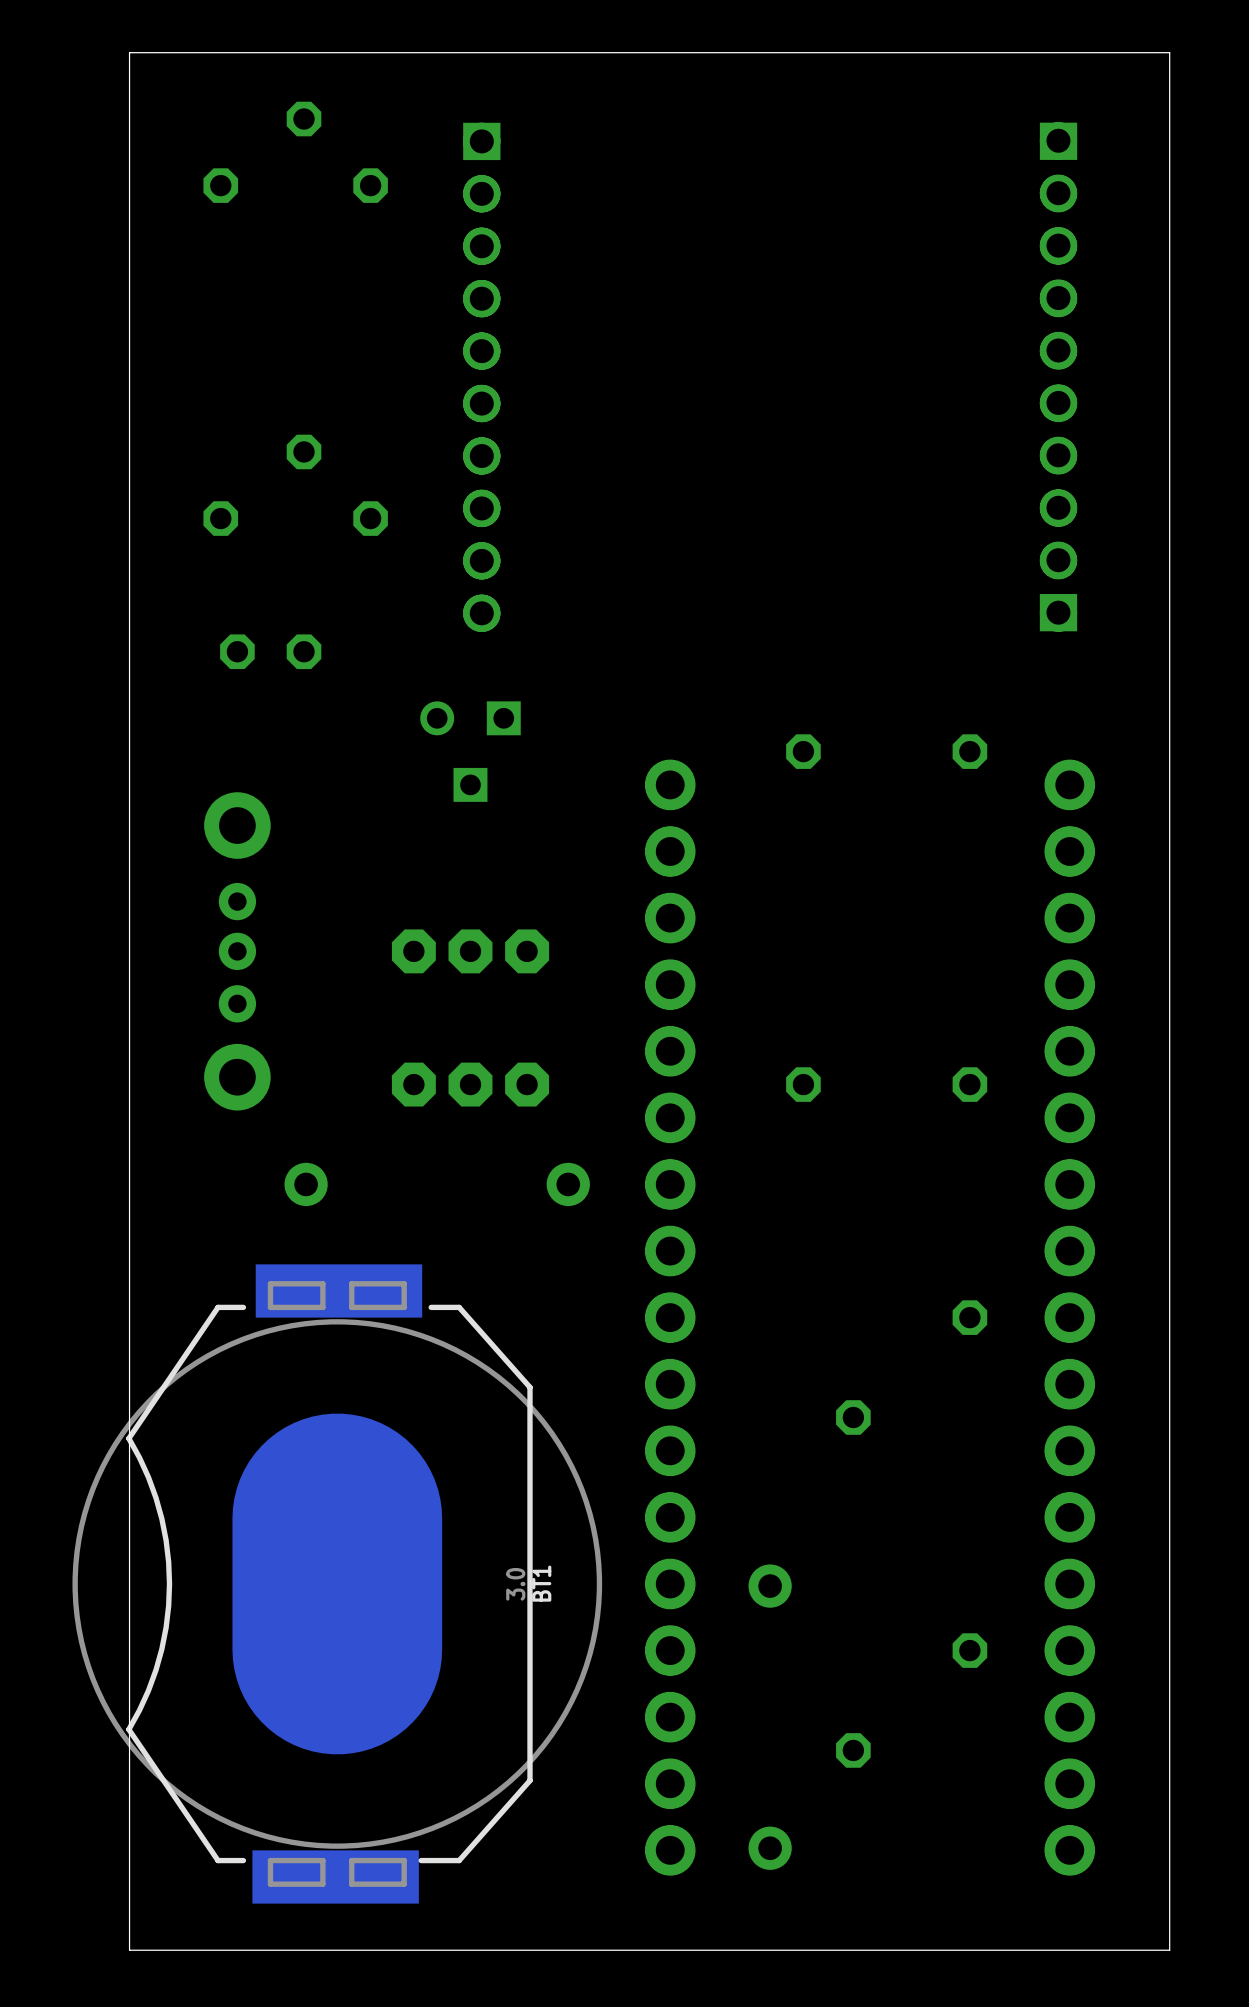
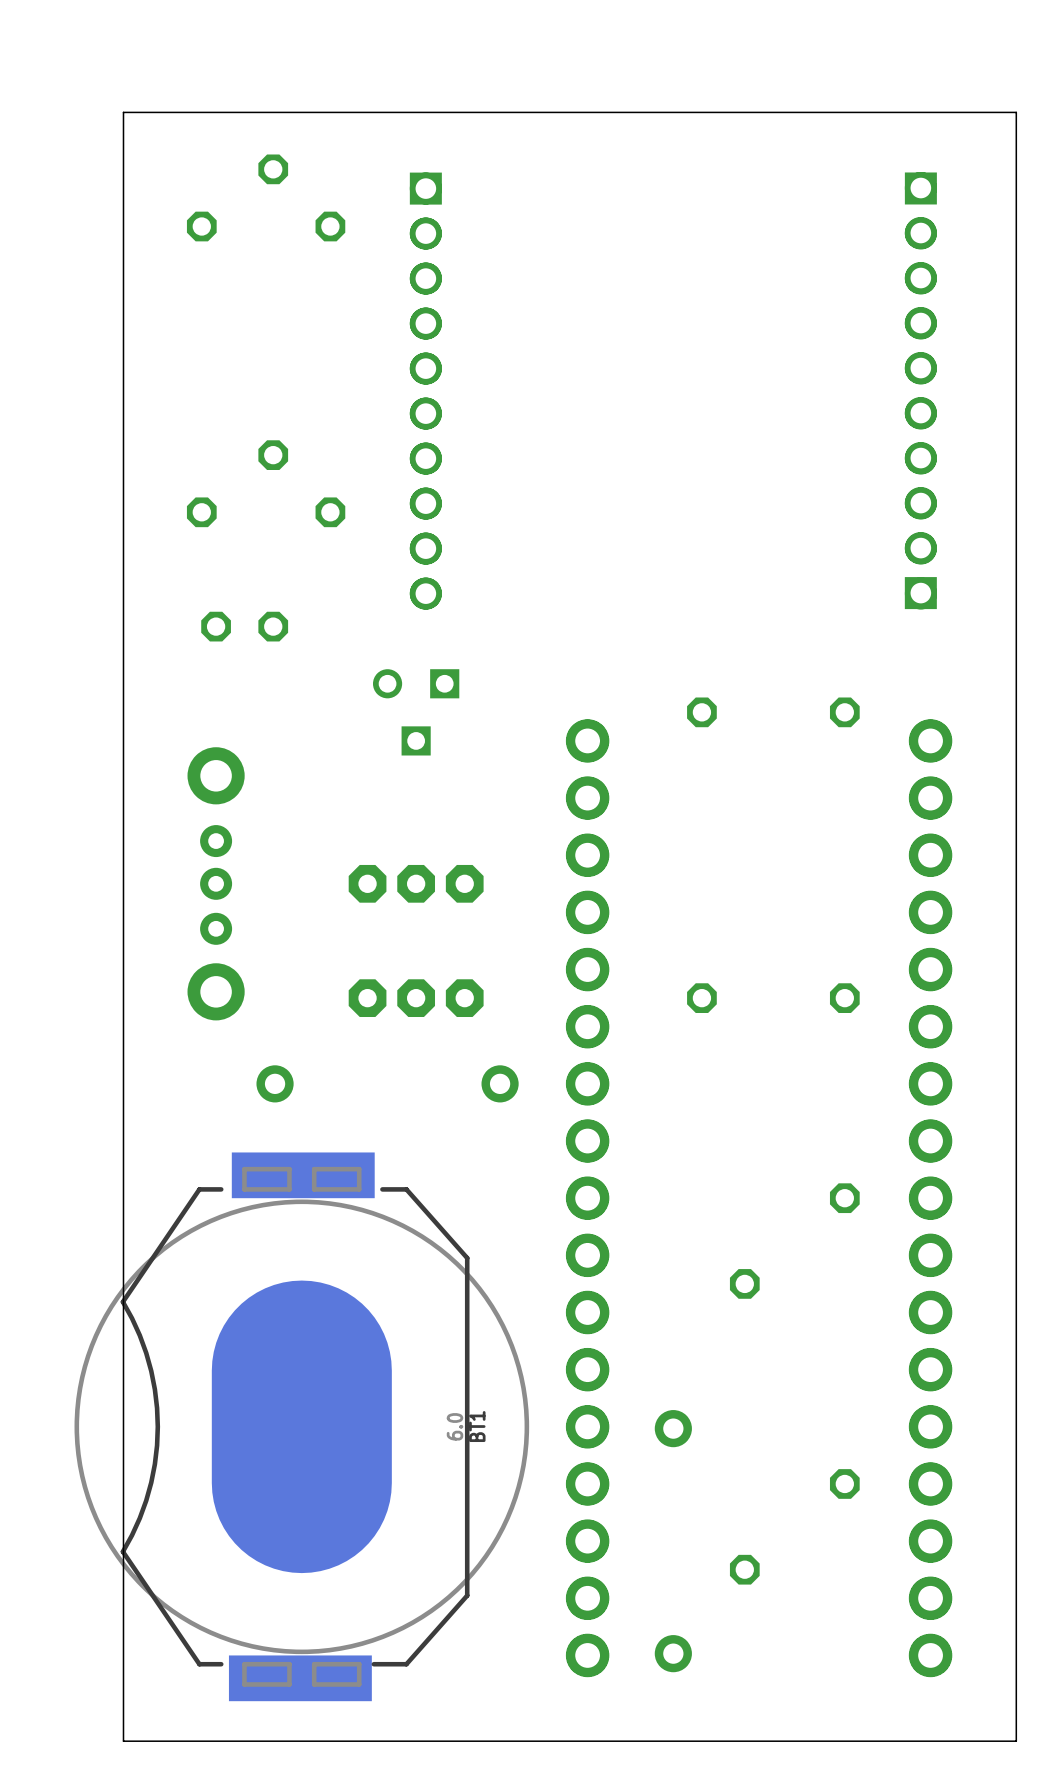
BT1 value: 3.0 (515, 1584) -> 6.0 (455, 1426)

